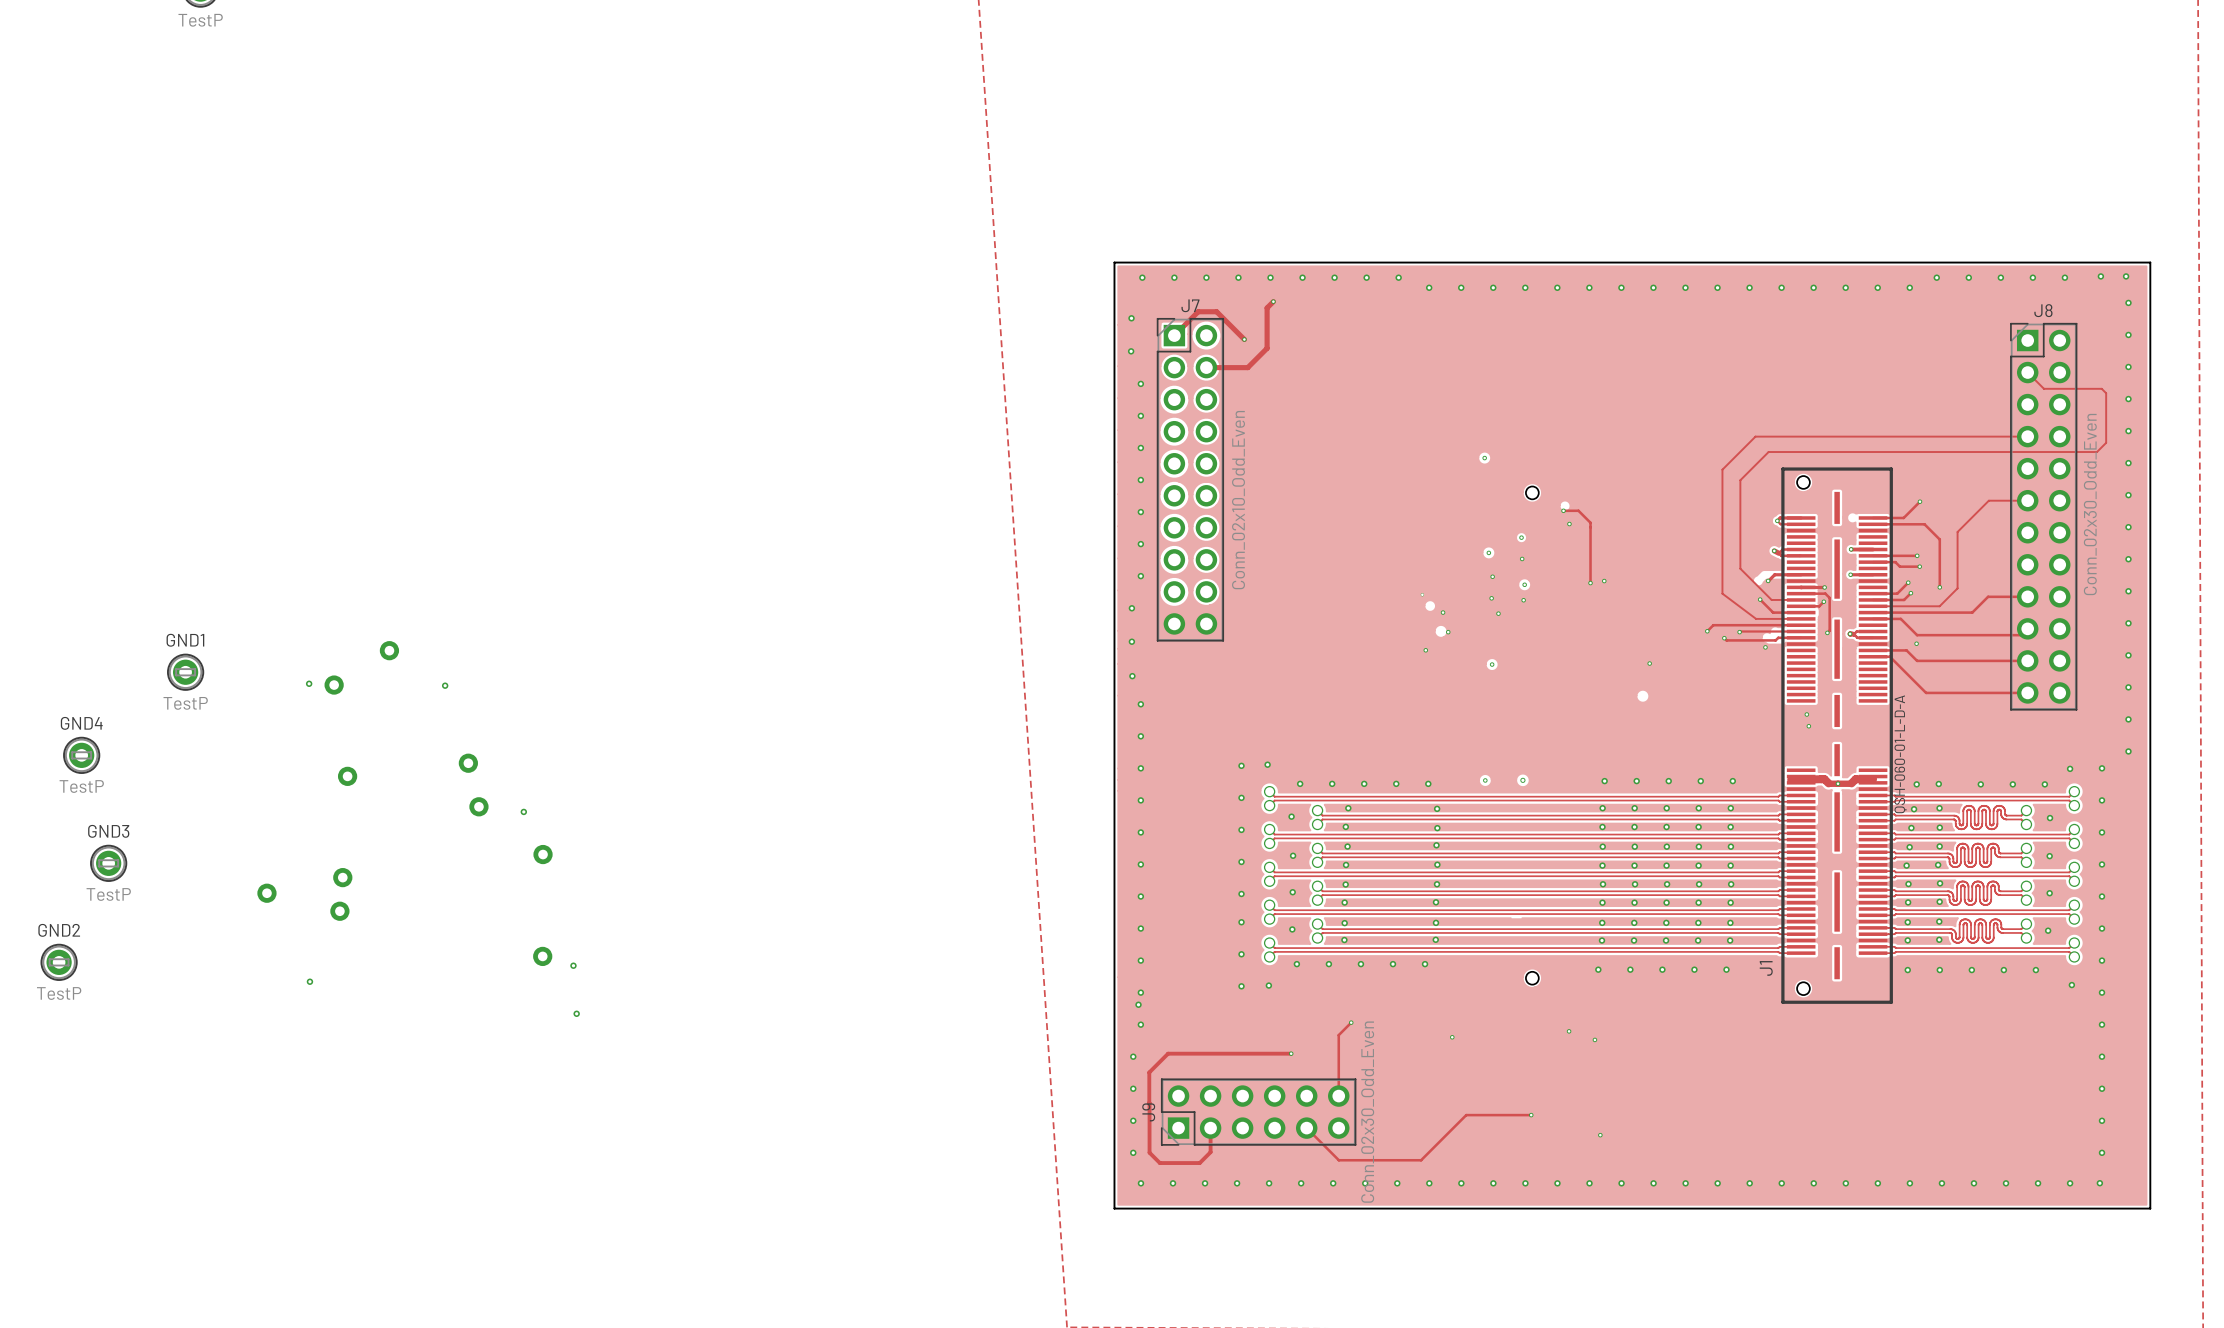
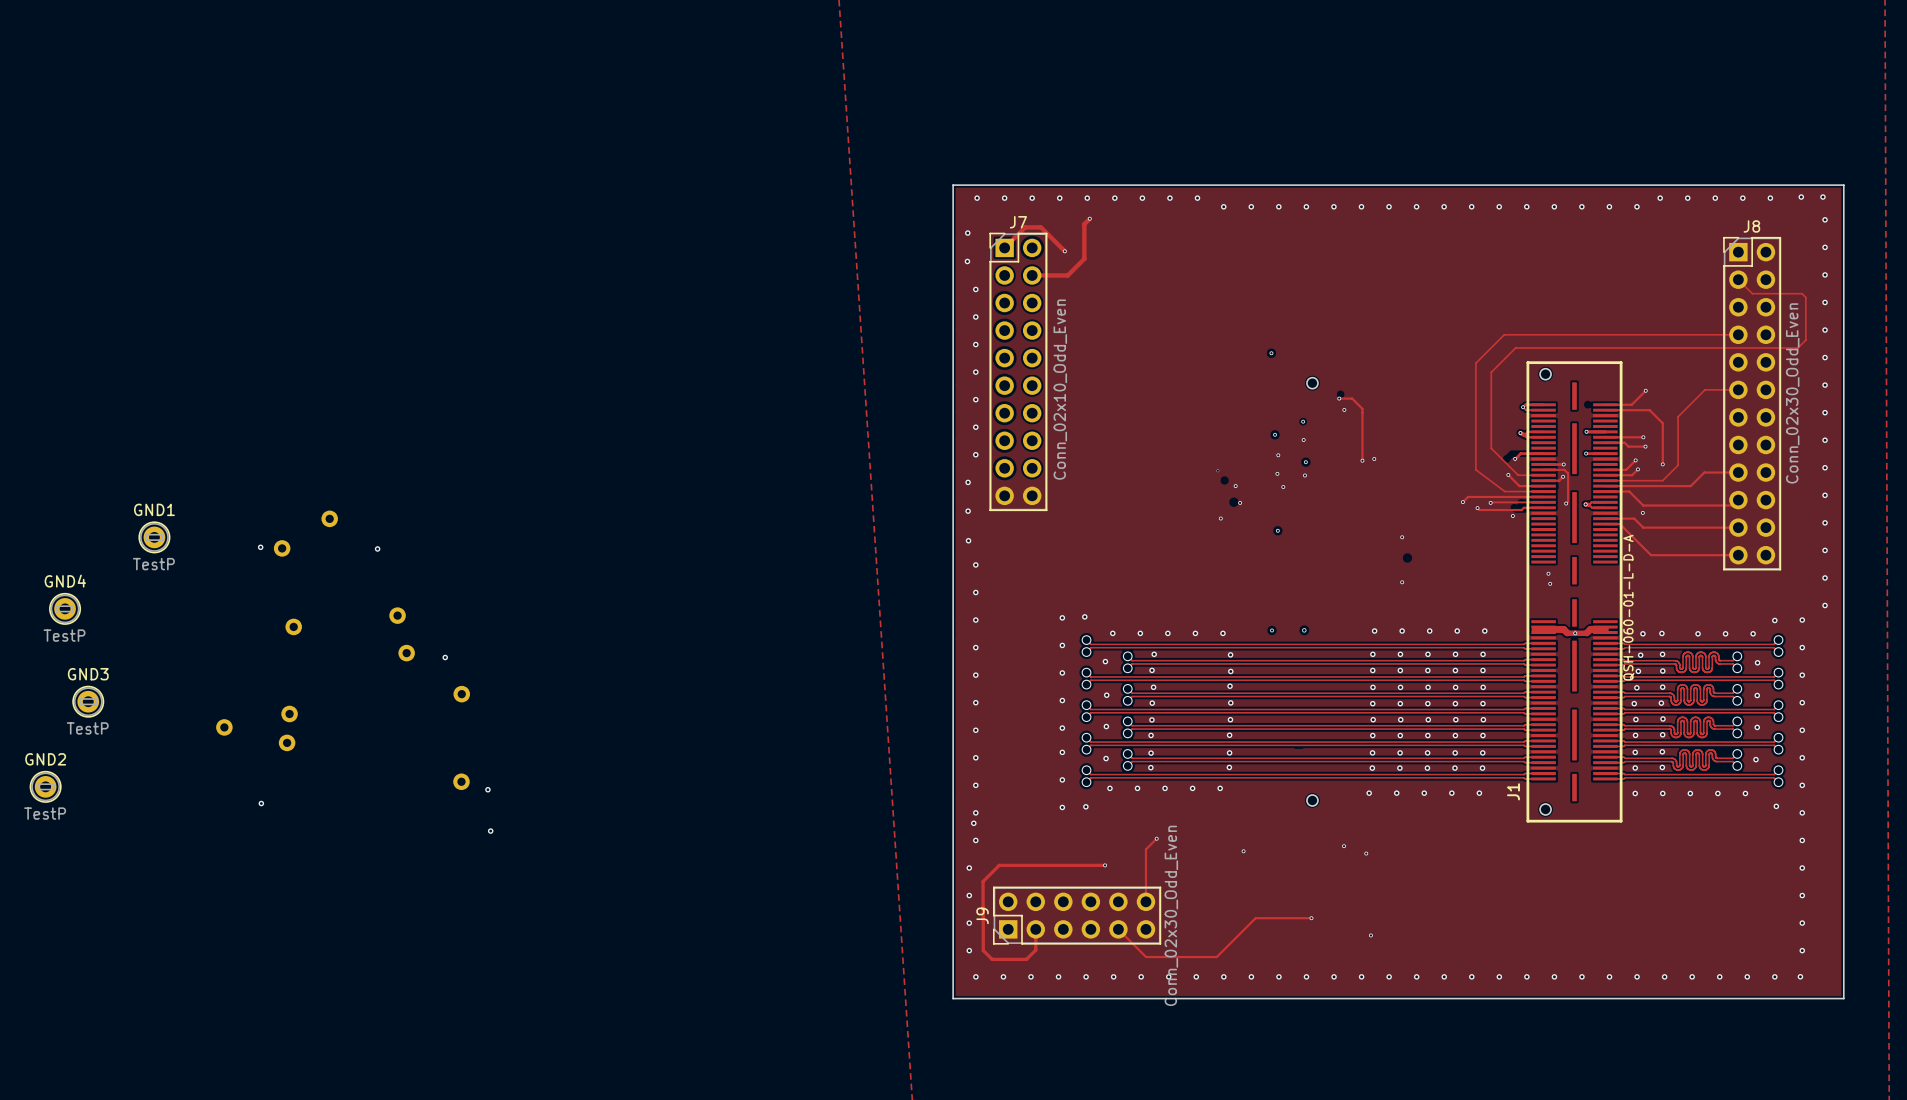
via position: (1649, 663) -> (1402, 537)
via: none -> (1402, 582)

